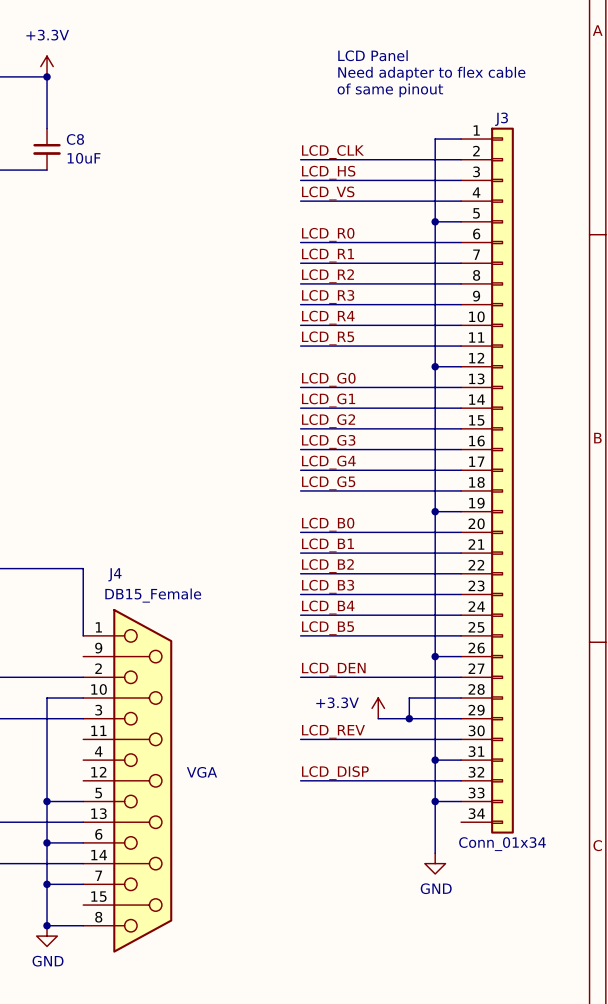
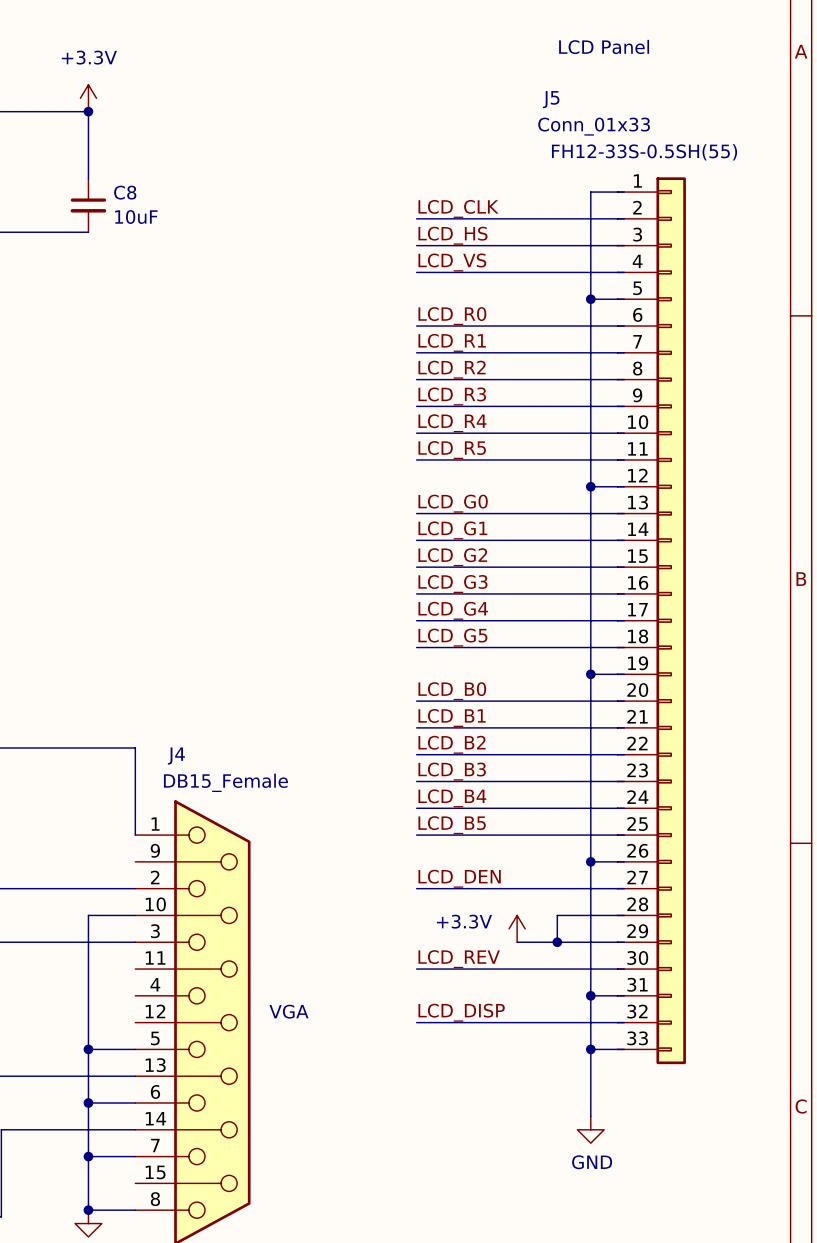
text position: LCD Panel (372, 55) -> LCD Panel (604, 46)
text: Need adapter to flex cable (431, 73) -> none
text: of same pinout (390, 90) -> none
J5: none -> Conn_01x33 (651, 620)
J3: Conn_01x34 (487, 480) -> none

